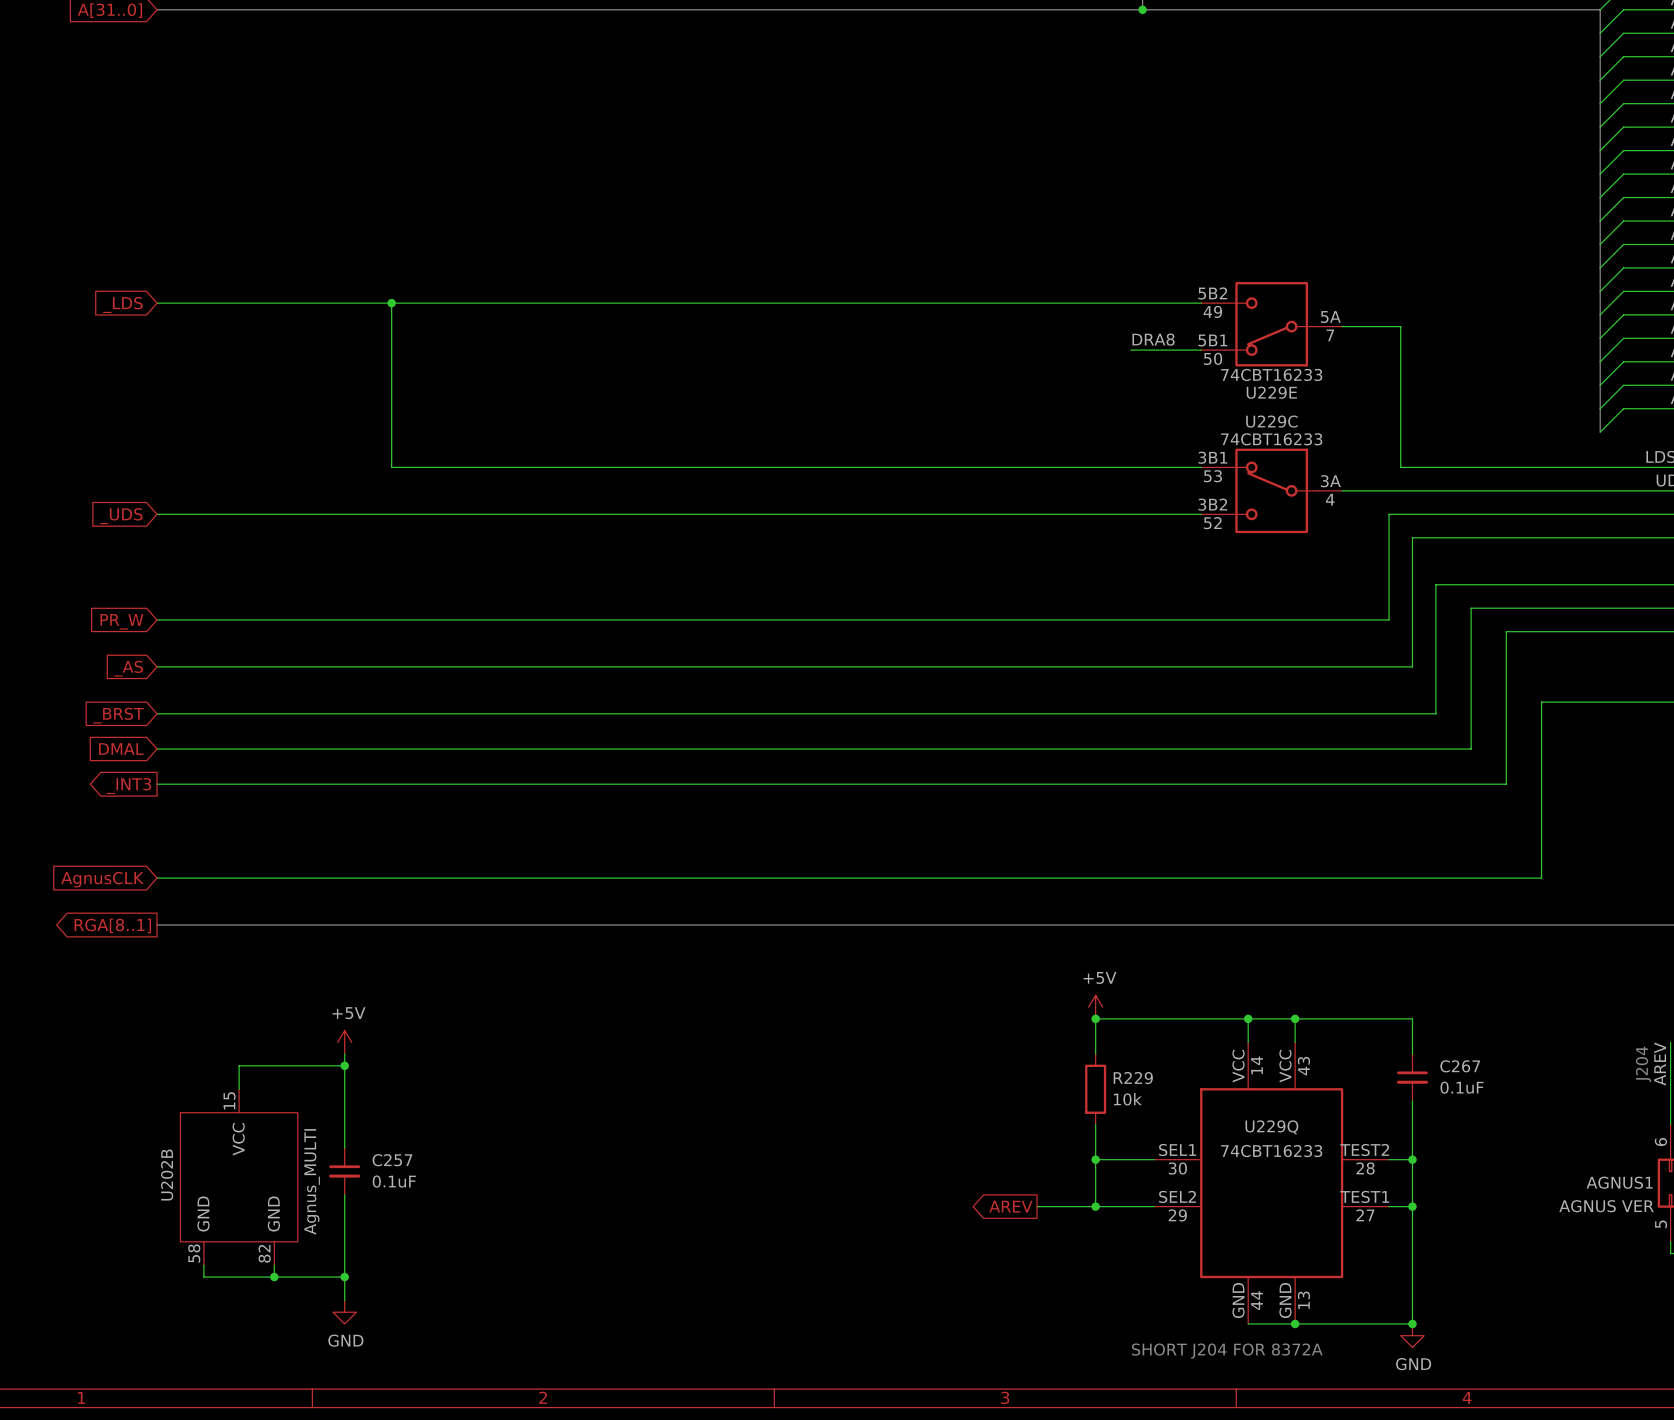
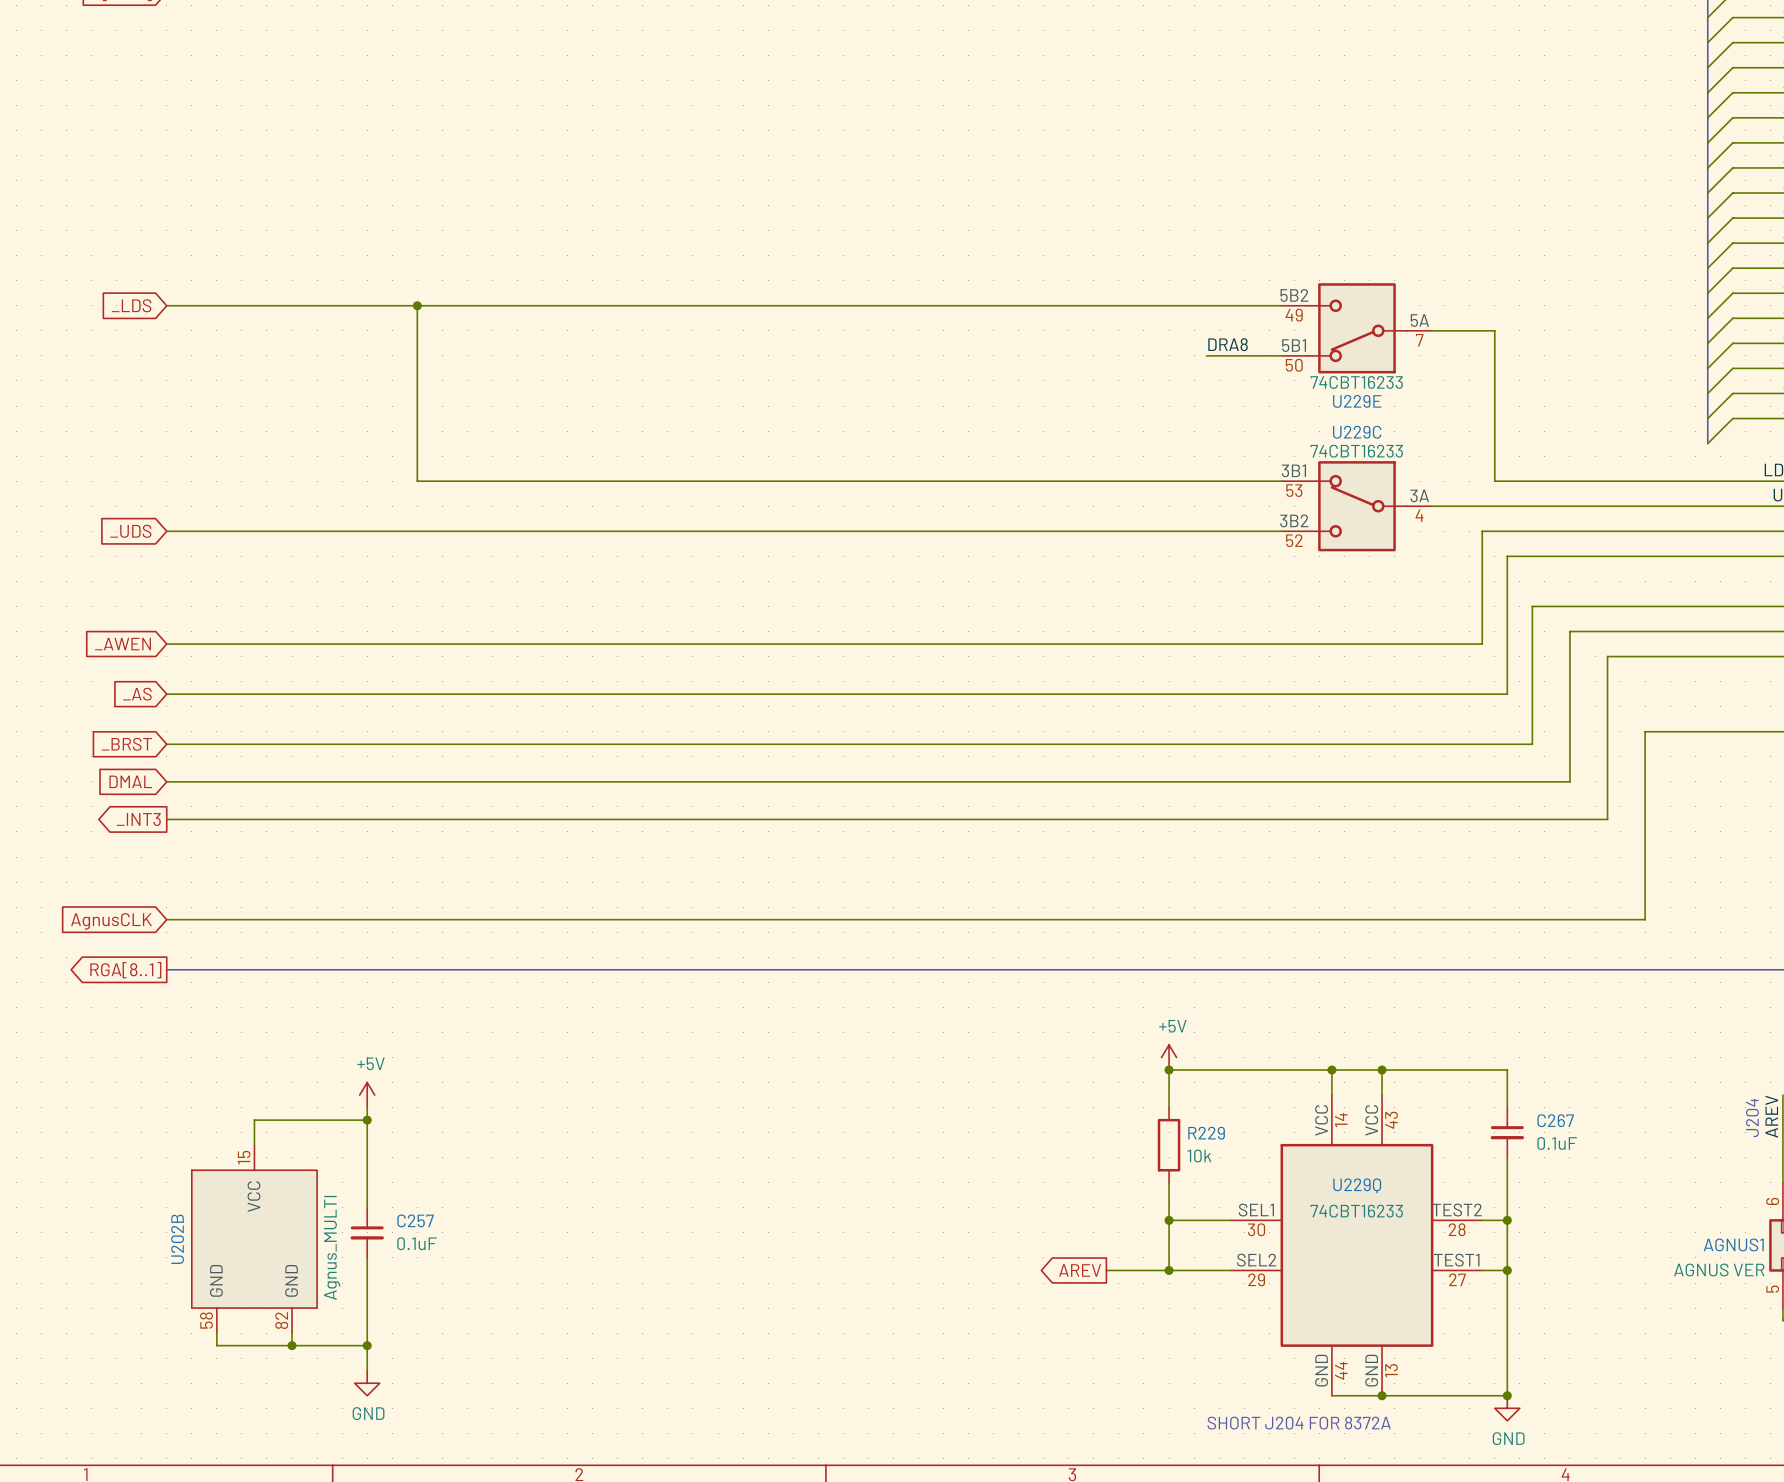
global label: PR_W (121, 621) -> _AWEN (122, 644)

